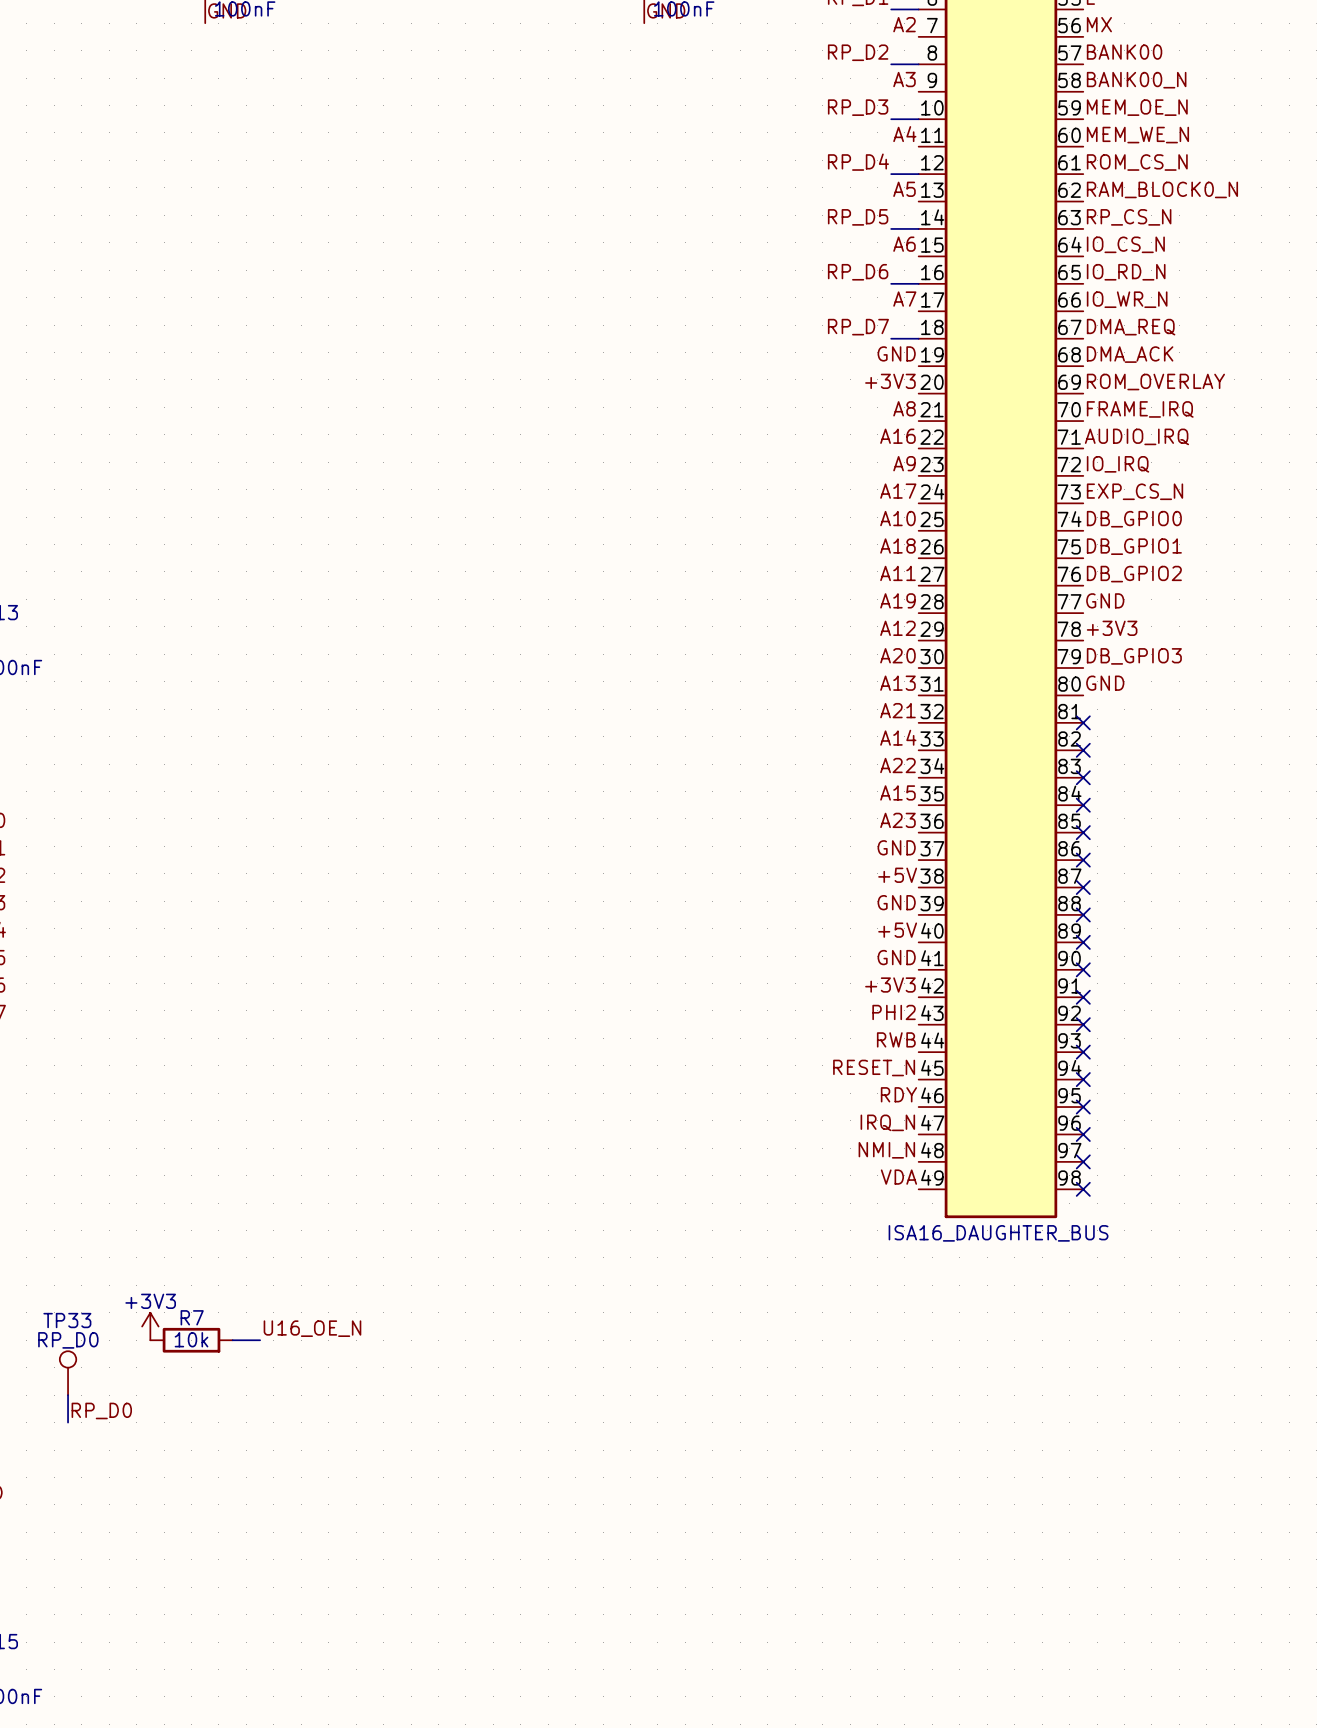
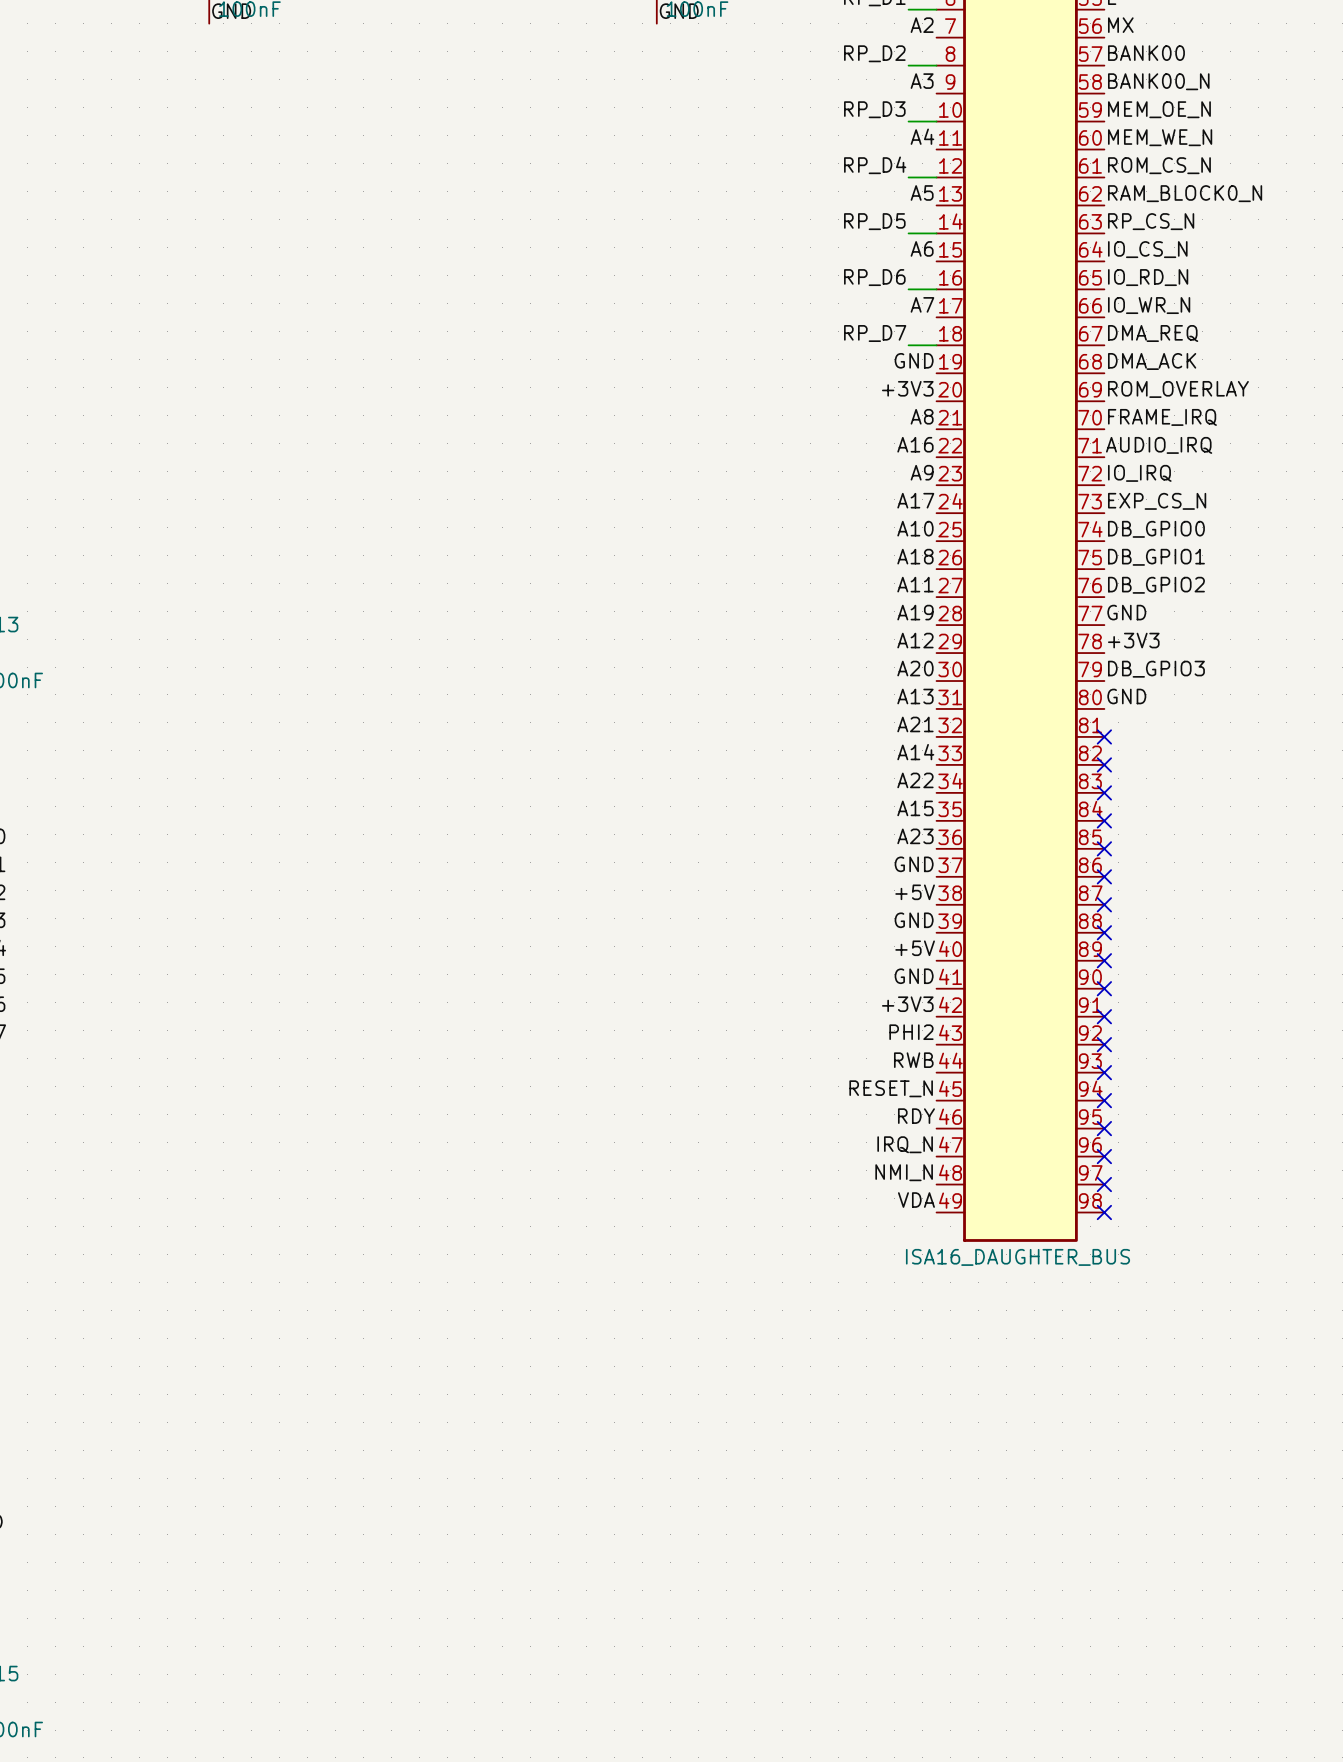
power symbol: +3V3 (150, 1326) -> none
label: U16_OE_N (312, 1328) -> none
R7: 10k (191, 1340) -> none
wire: (232, 1340) (260, 1340) -> none
TP33: RP_D0 (68, 1373) -> none
wire: (68, 1395) (68, 1422) -> none
label: RP_D0 (101, 1410) -> none

